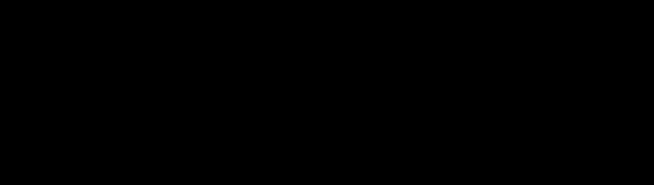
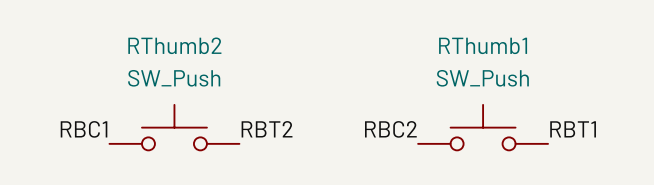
RThumb2: none -> SW_Push (174, 127)
RThumb1: none -> SW_Push (483, 127)
label: none -> RBC1 (84, 129)
label: none -> RBT2 (267, 129)
label: none -> RBC2 (390, 129)
label: none -> RBT1 (573, 129)

